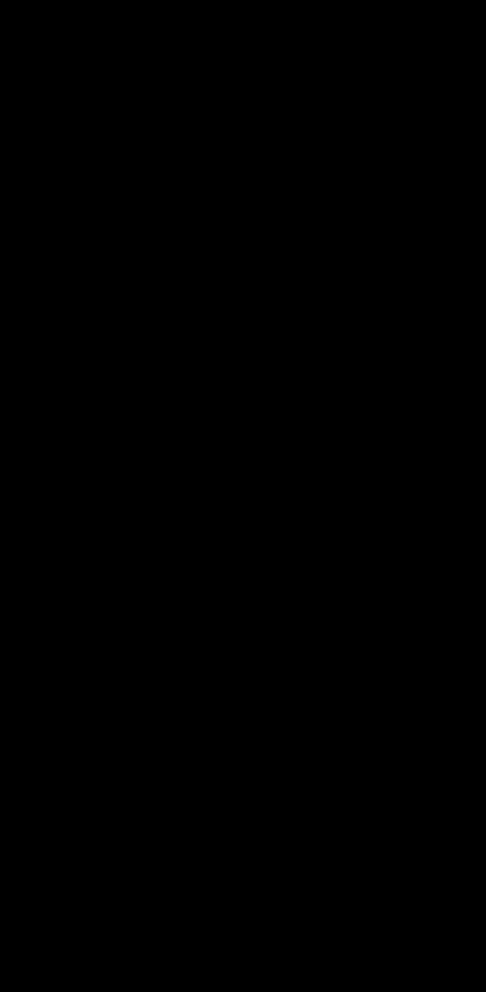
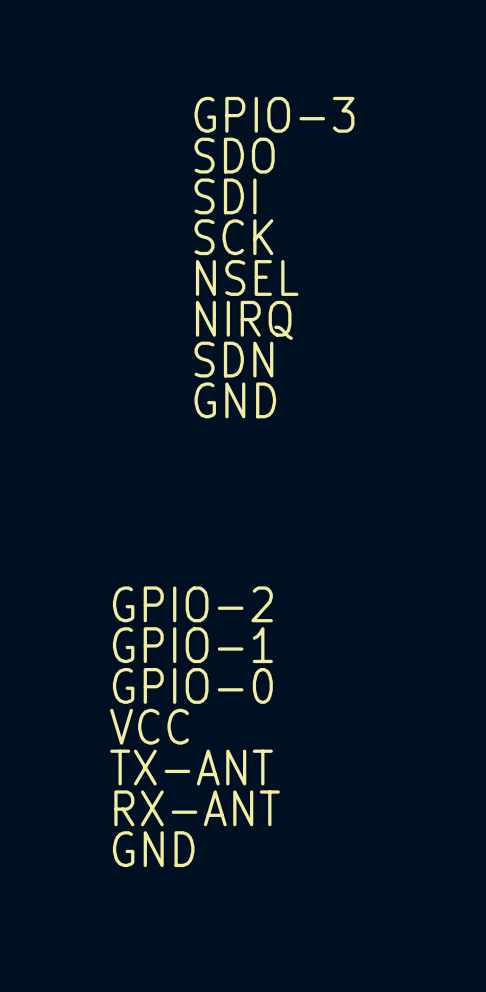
text: none -> GPIO-3 (274, 114)
text: none -> SDO (234, 155)
text: none -> SDI (225, 196)
text: none -> SCK (233, 237)
text: none -> NSEL (247, 277)
text: none -> NIRQ (244, 320)
text: none -> SDN (233, 359)
text: none -> GND (235, 400)
text: none -> GPIO-2 (192, 604)
text: none -> GPIO-1 (192, 645)
text: none -> GPIO-0 (192, 685)
text: none -> VCC (149, 726)
text: none -> TX-ANT (191, 767)
text: none -> RX-ANT (197, 808)
text: none -> GND (153, 849)

